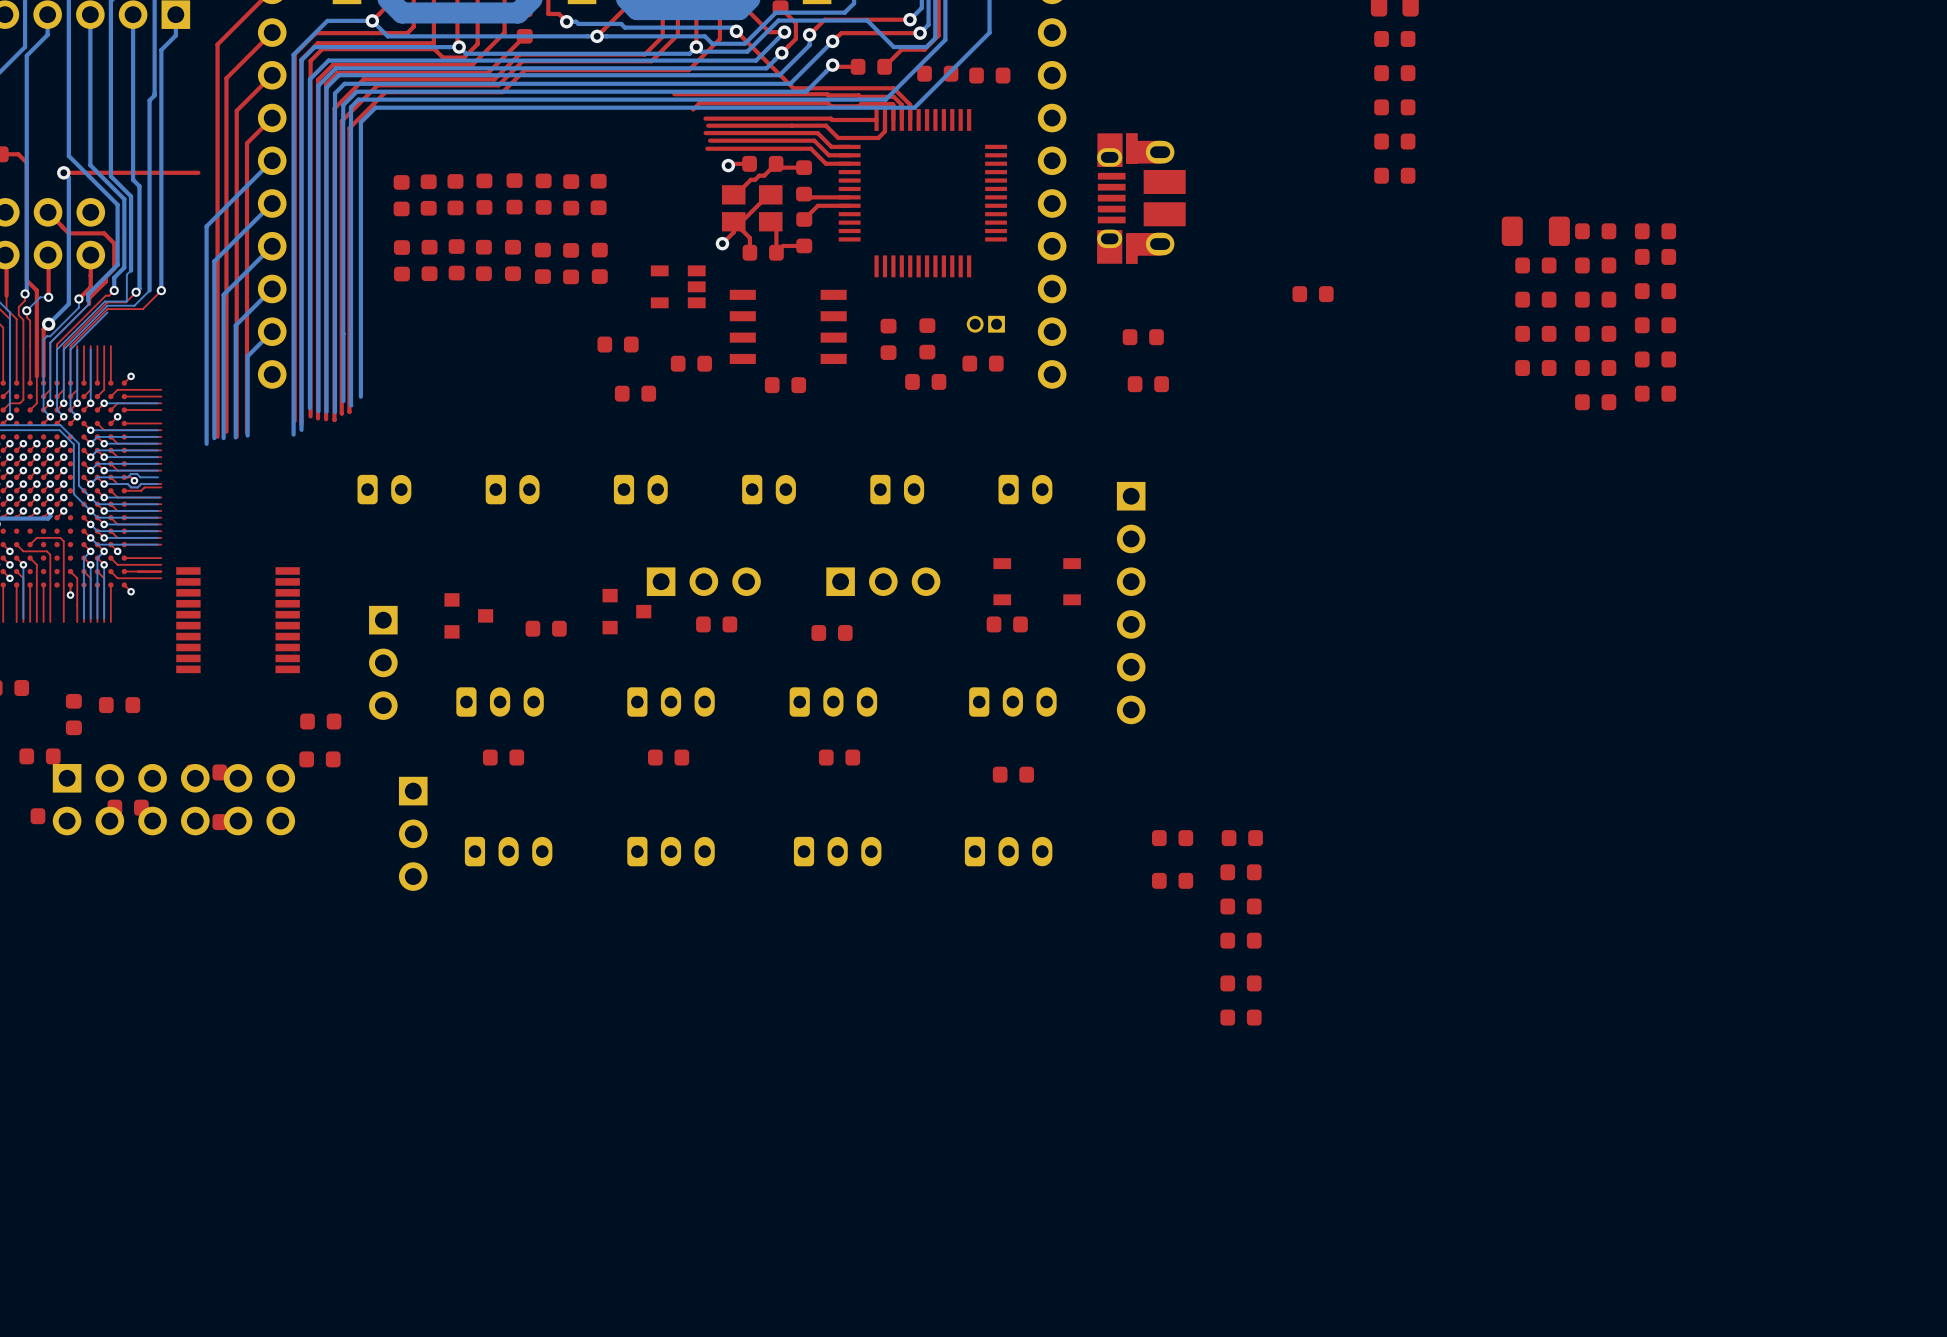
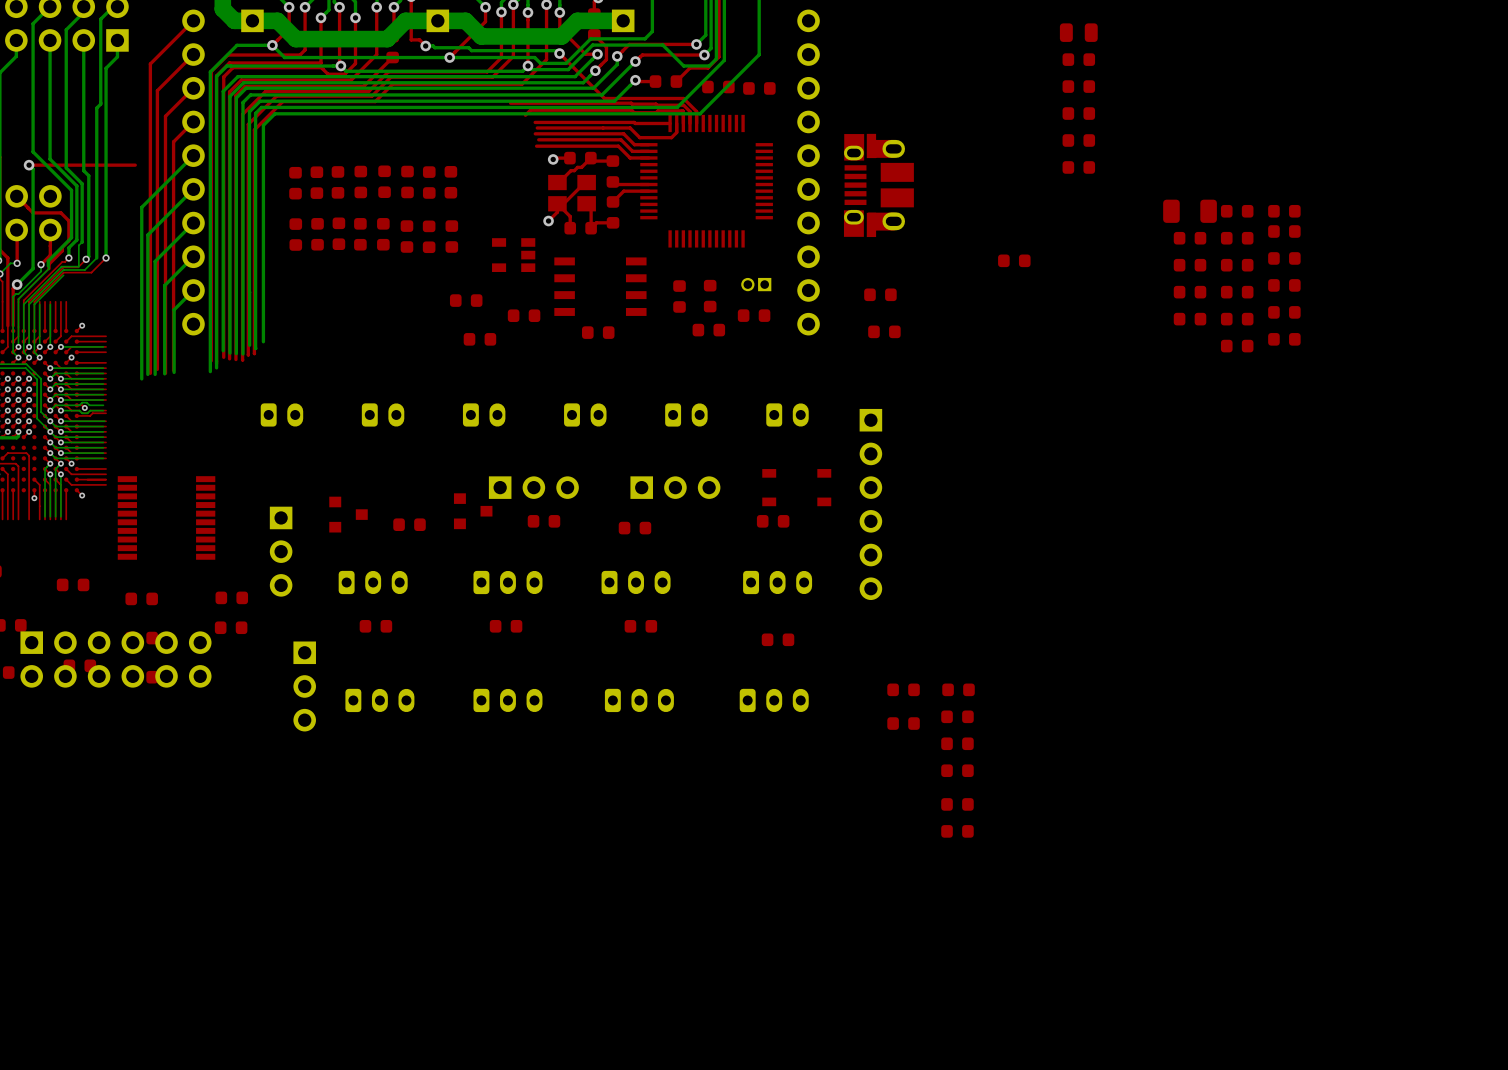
part rotation: 0° (73, 714) -> 90° clockwise (141, 598)
part position: (73, 714) -> (141, 598)

